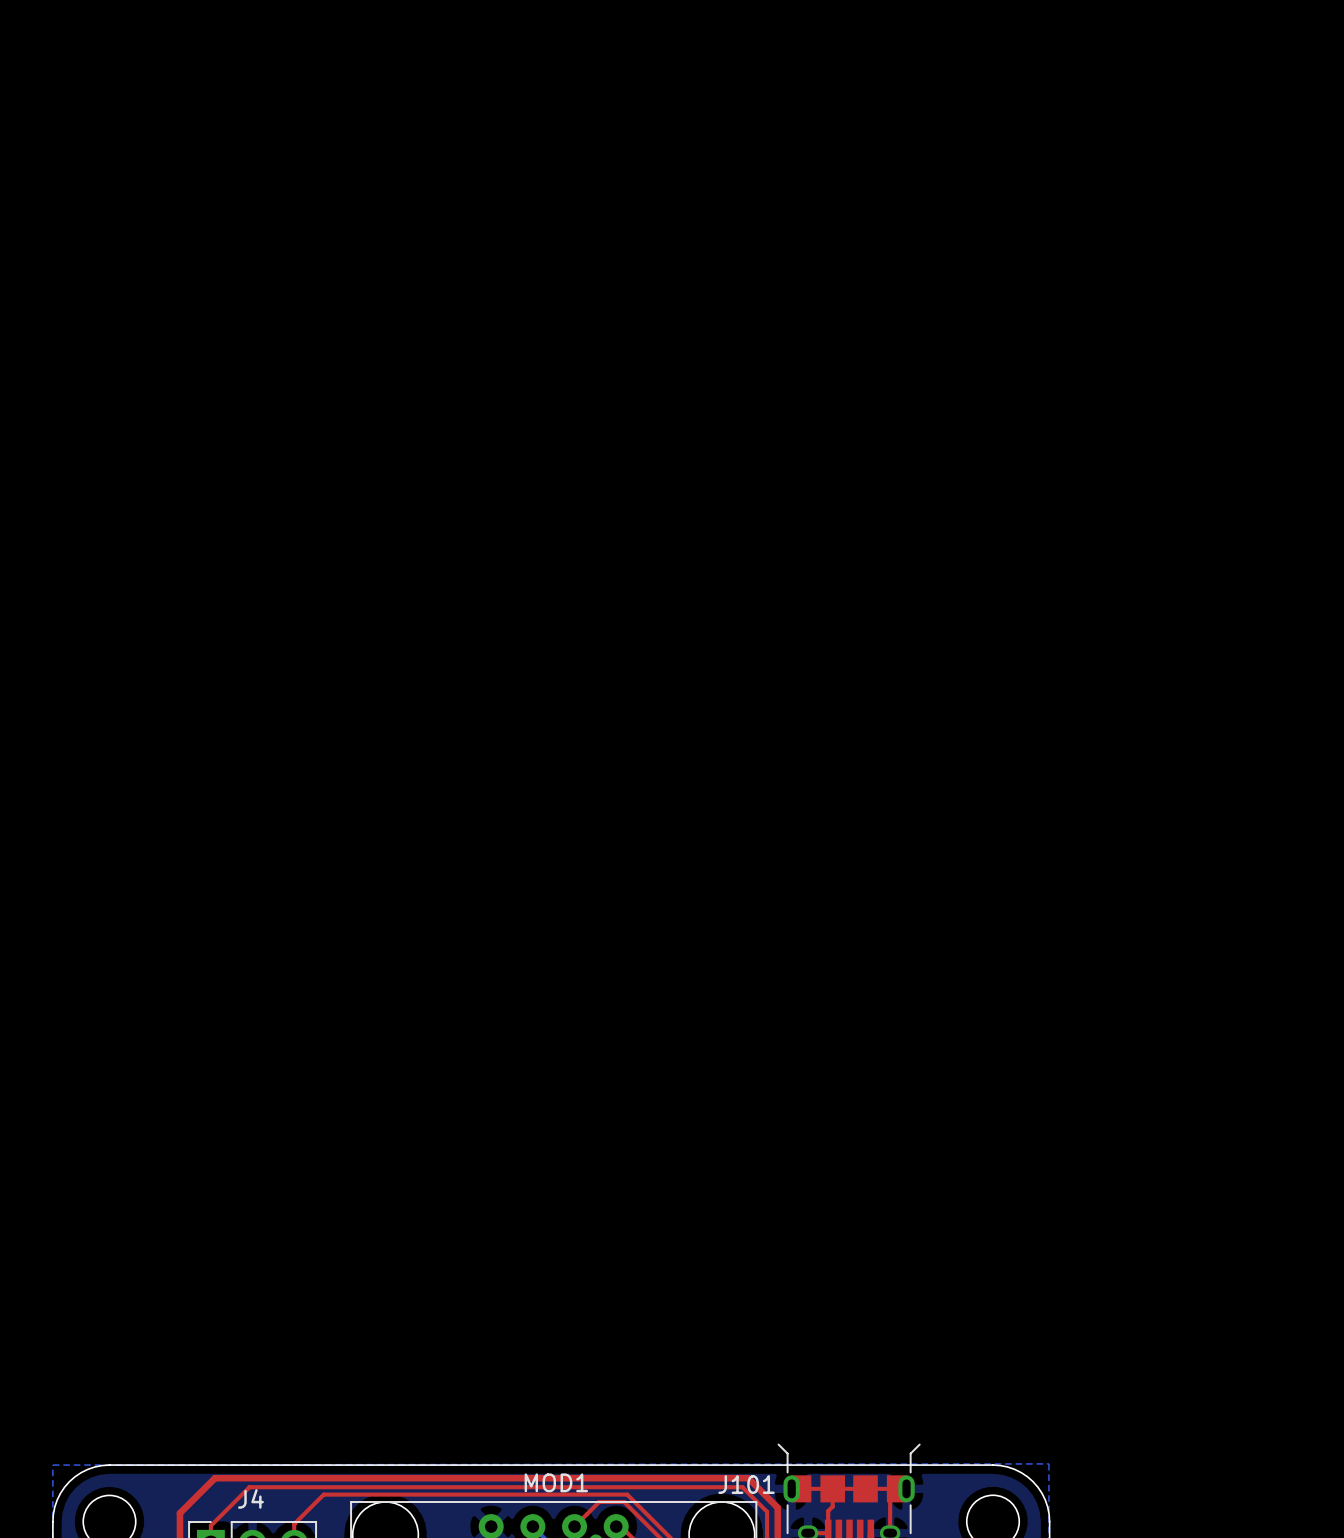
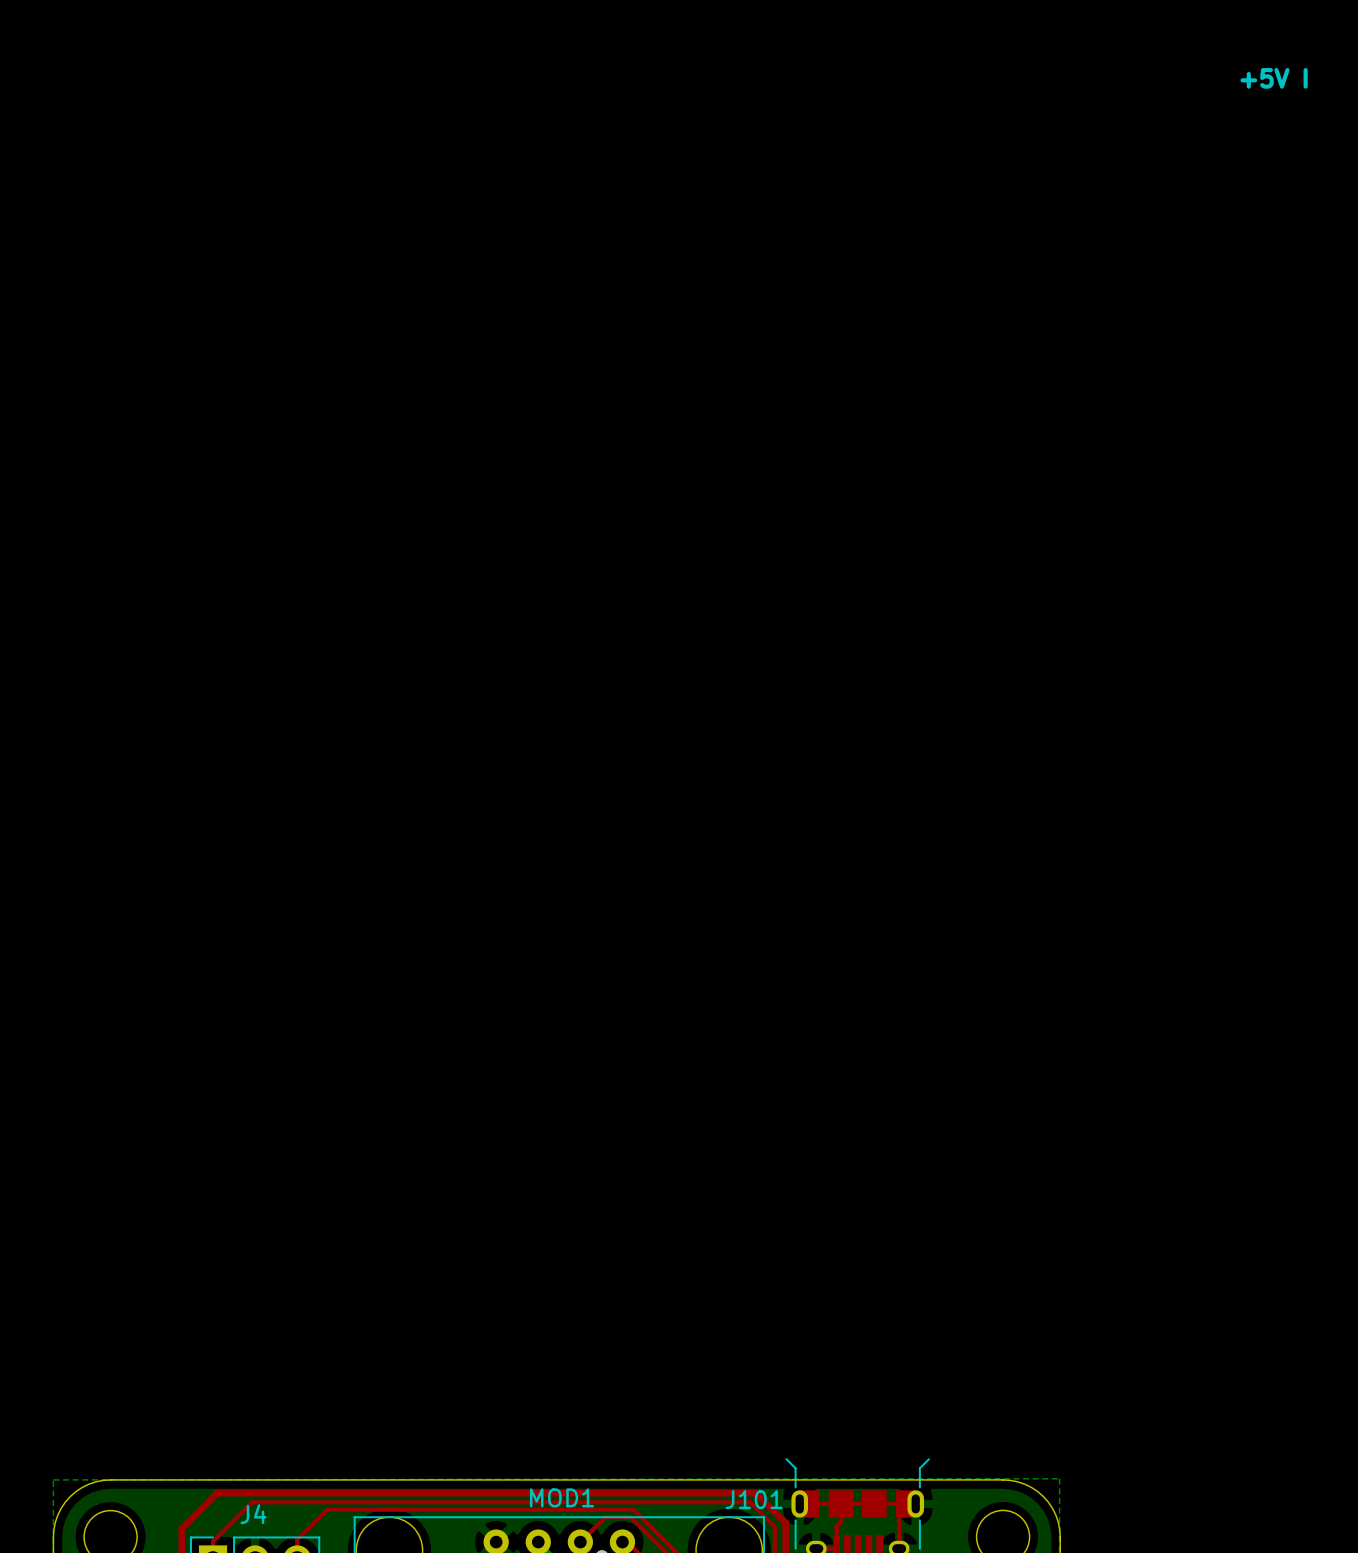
text: none -> +5V I (1274, 78)

